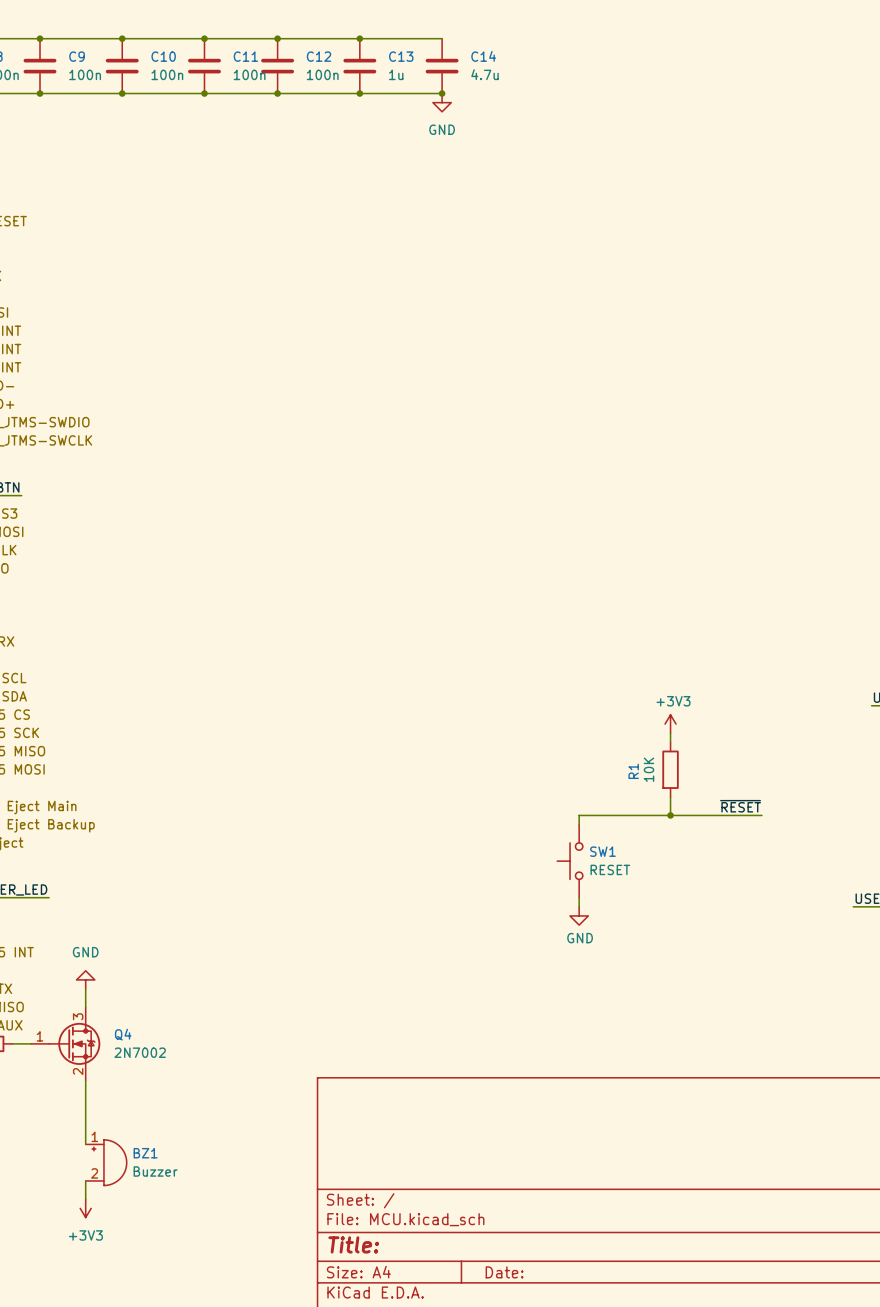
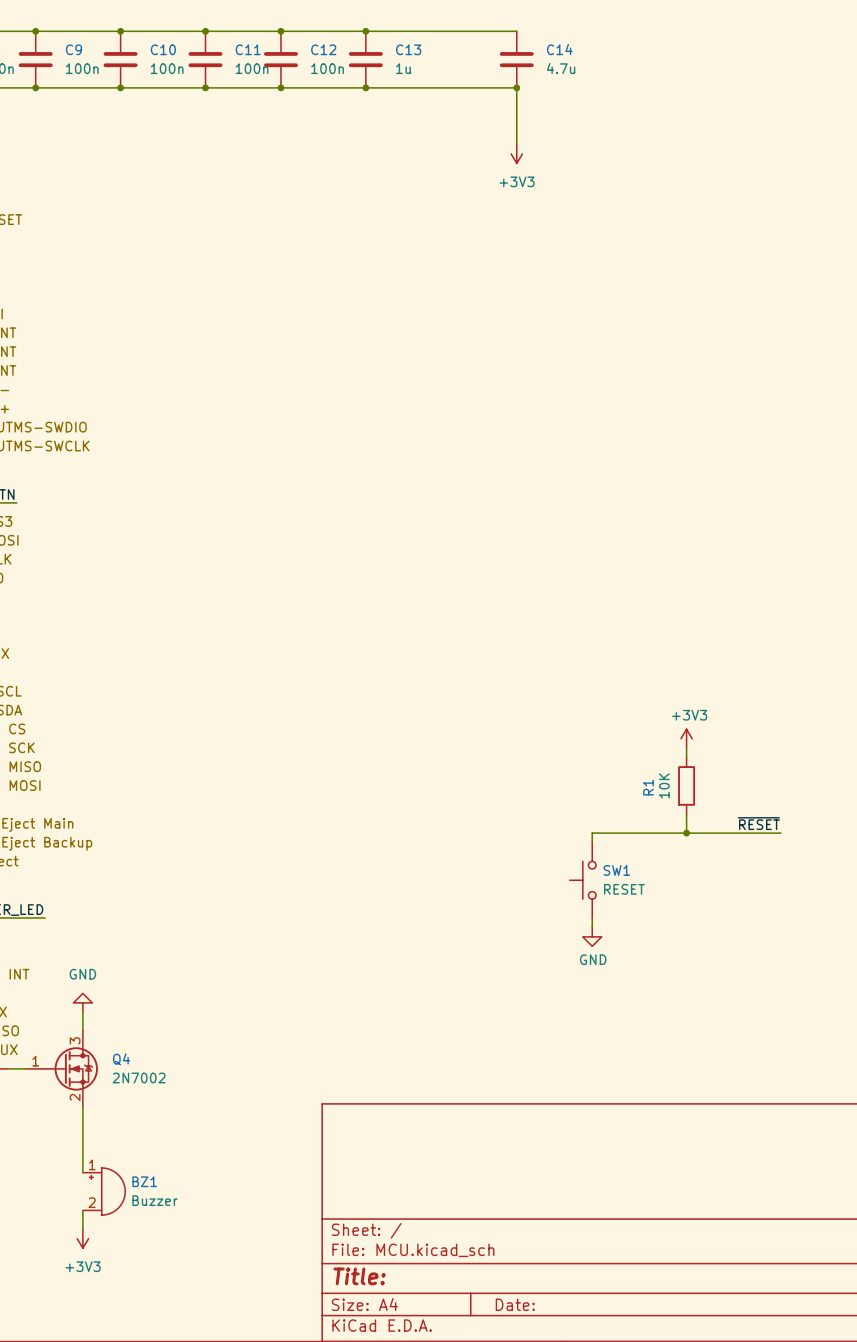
wire: none -> (450, 31) (516, 31)
C14 position: (442, 66) -> (516, 59)
wire: none -> (450, 87) (516, 87) (516, 144)
junction: (442, 93) -> none
junction: none -> (516, 87)
power symbol: GND (442, 102) -> none
power symbol: none -> +3V3 (516, 153)

